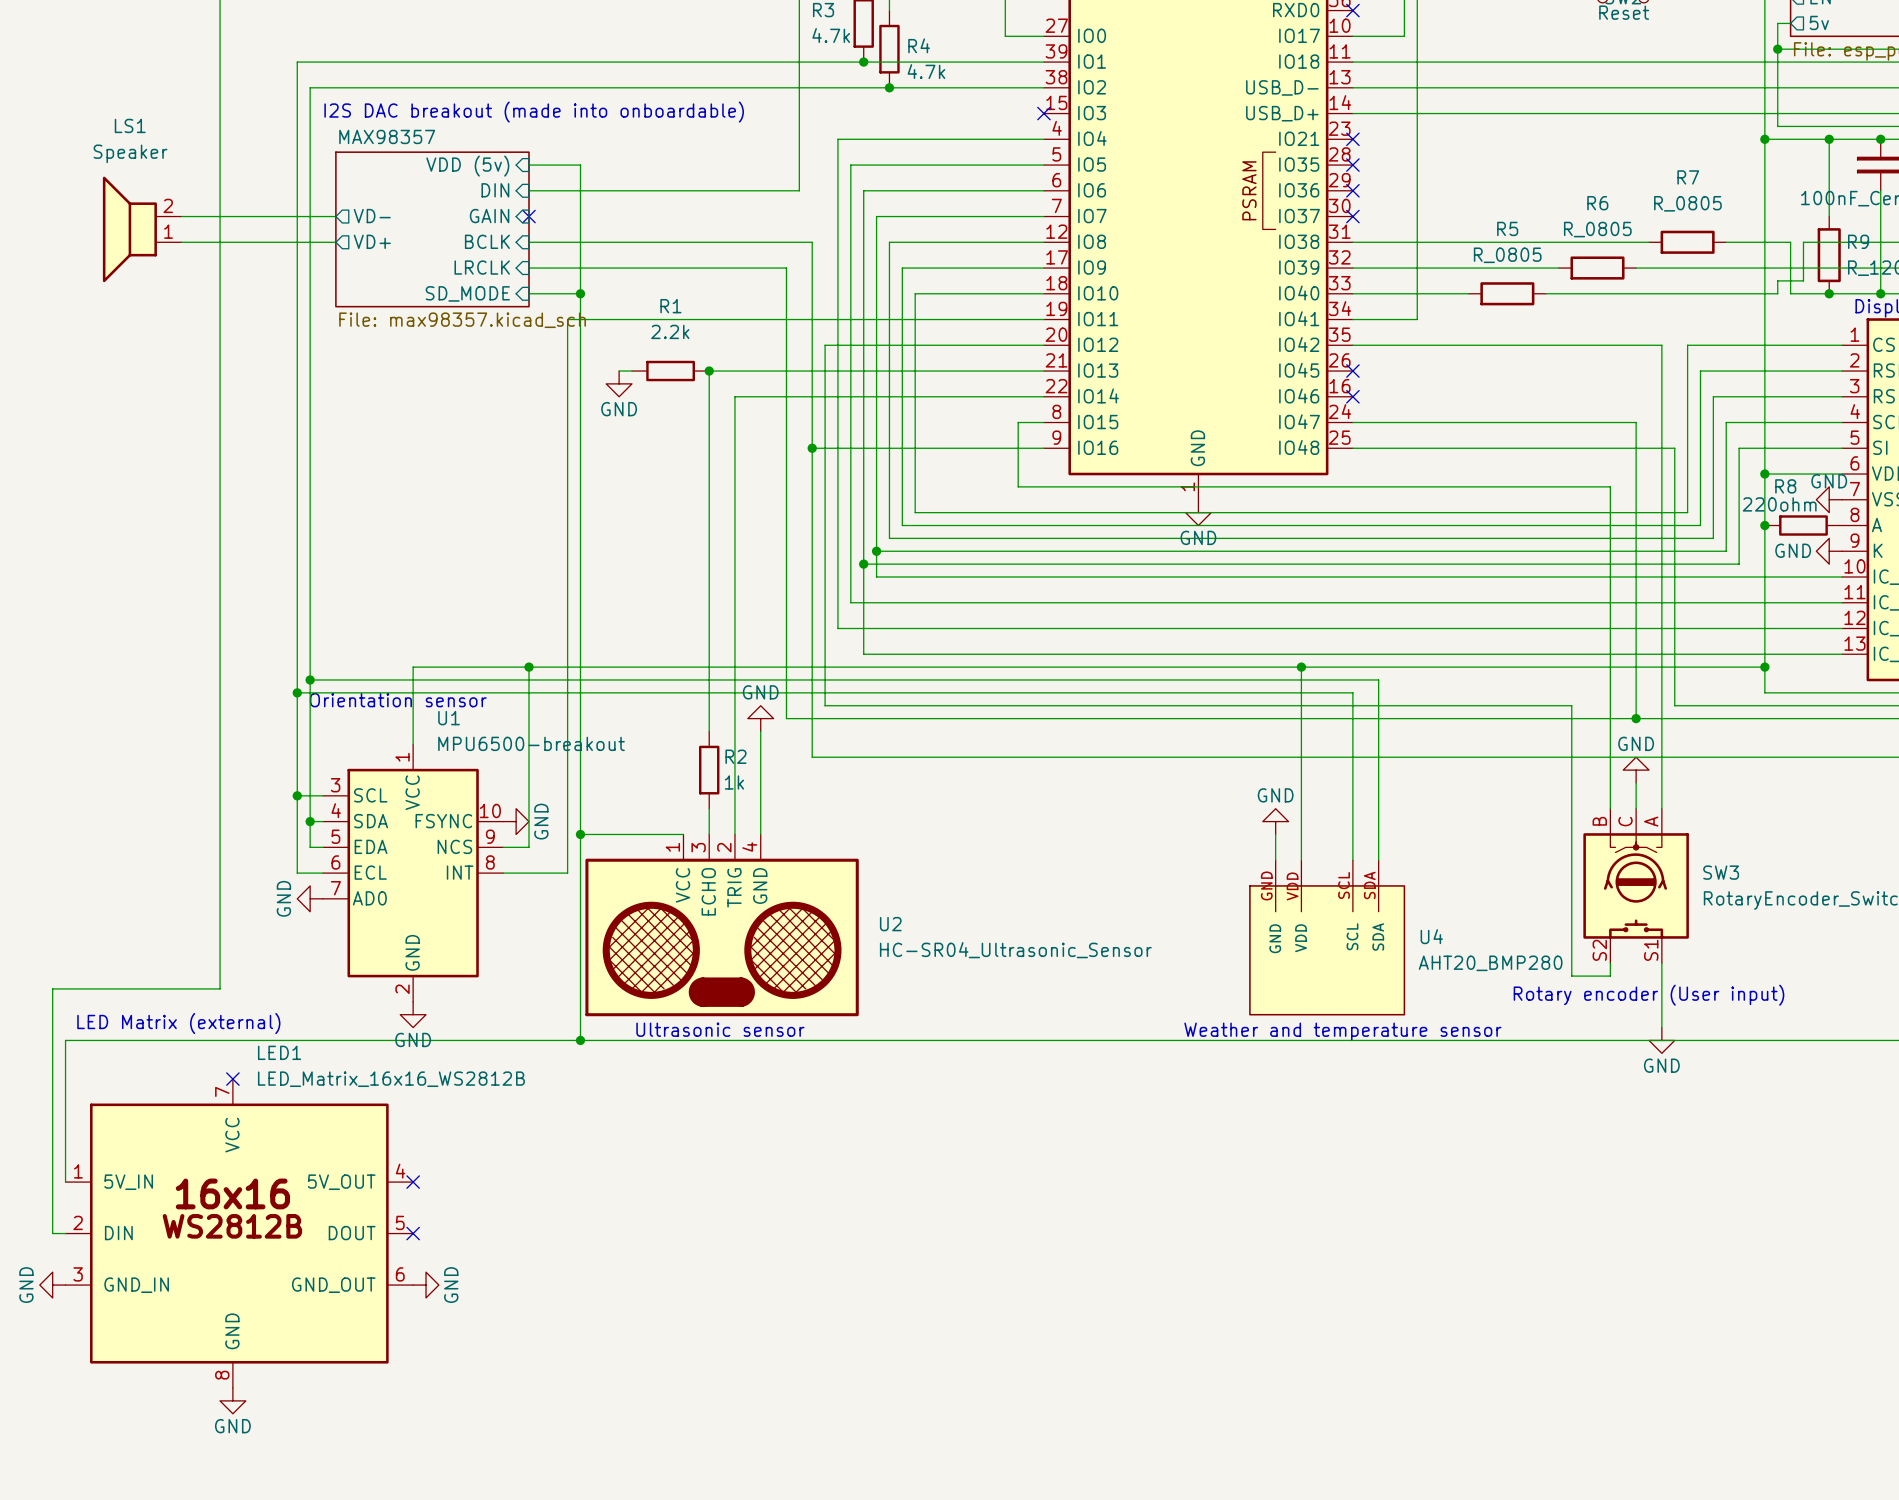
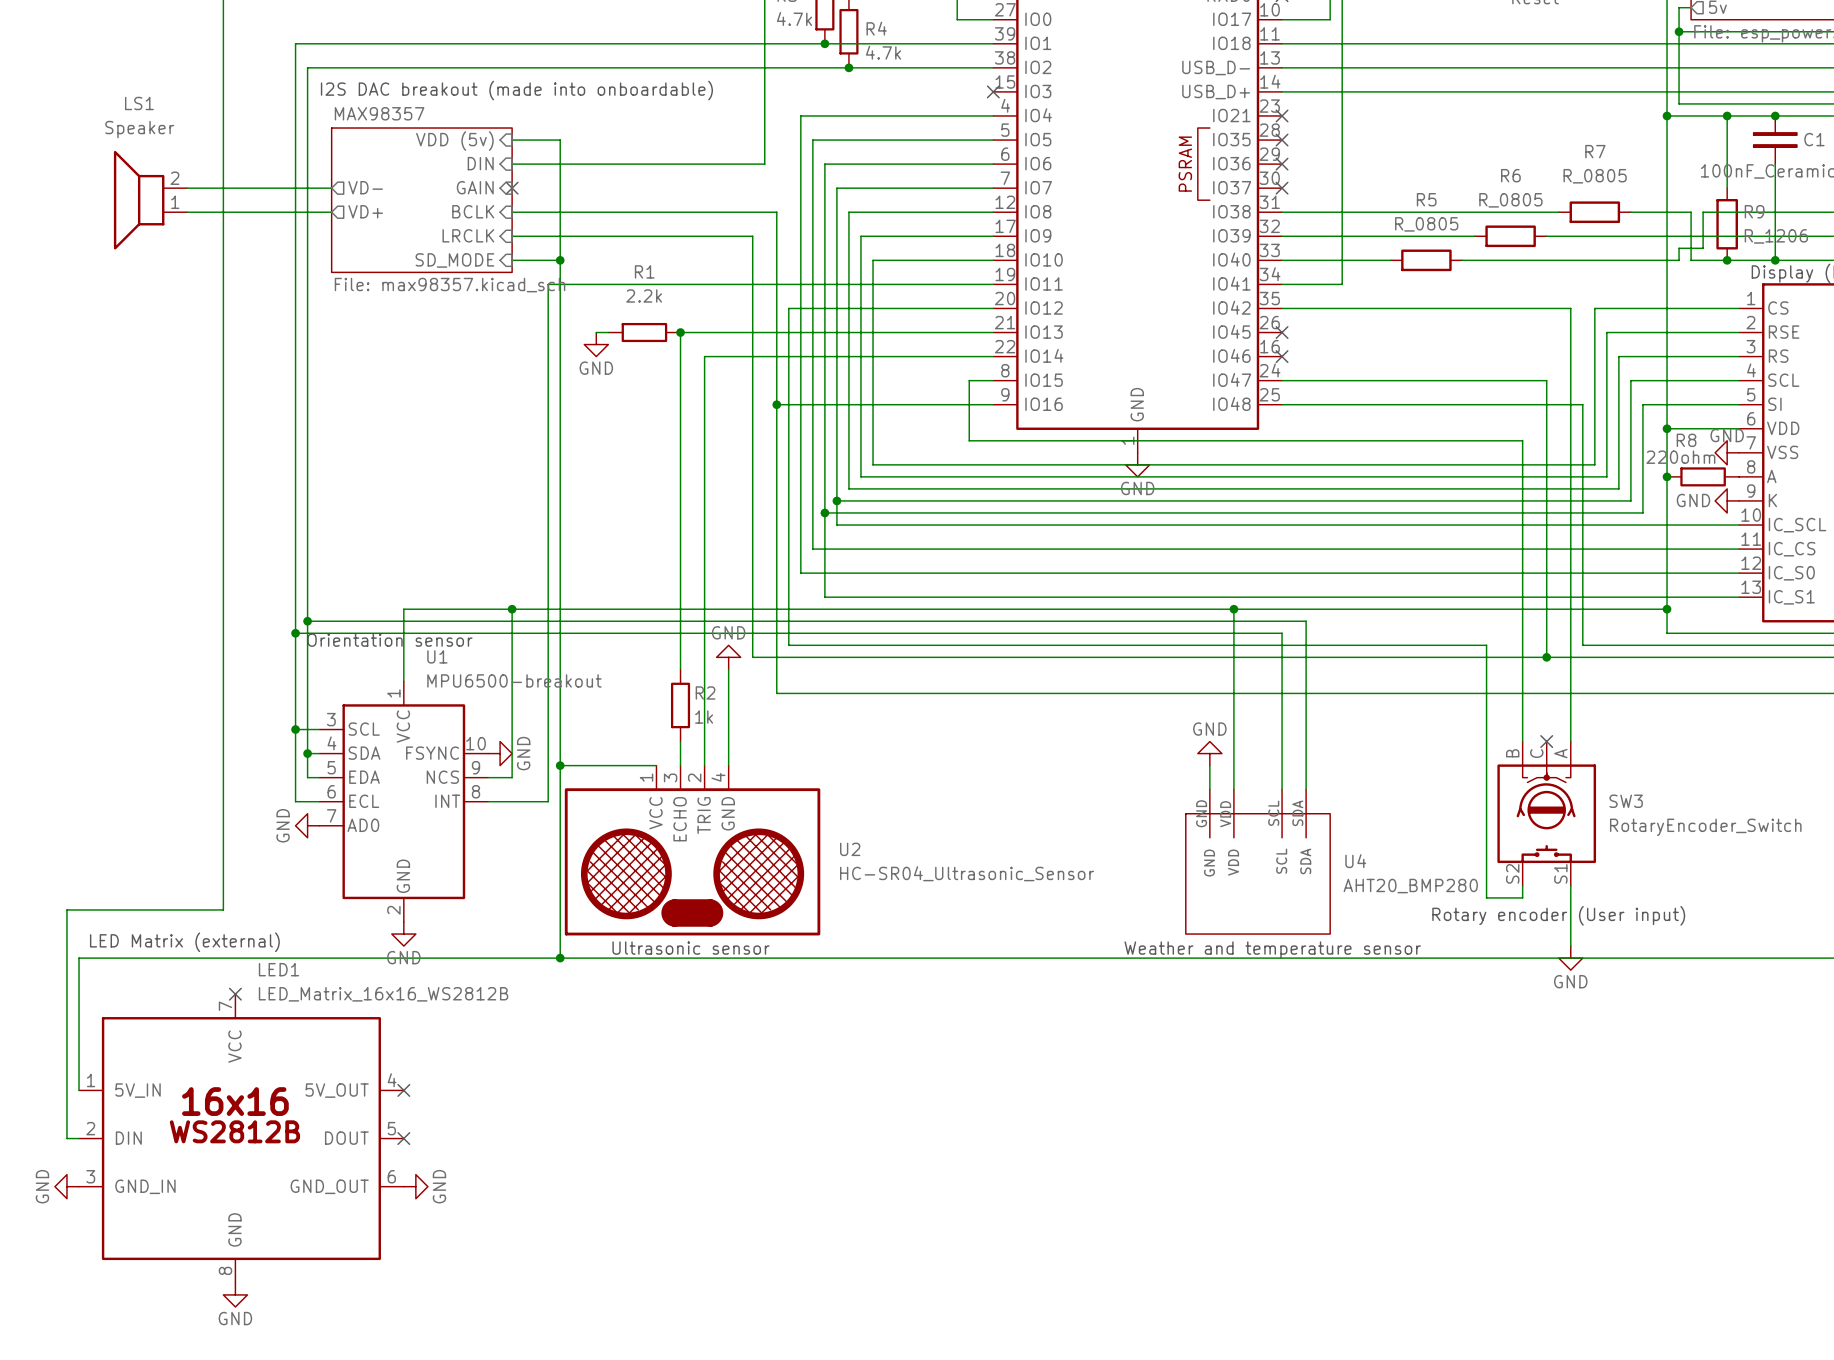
power symbol: GND (1636, 770) -> none
wire: (1636, 782) (1636, 808) -> none
no-connect mark: none -> (1546, 741)

